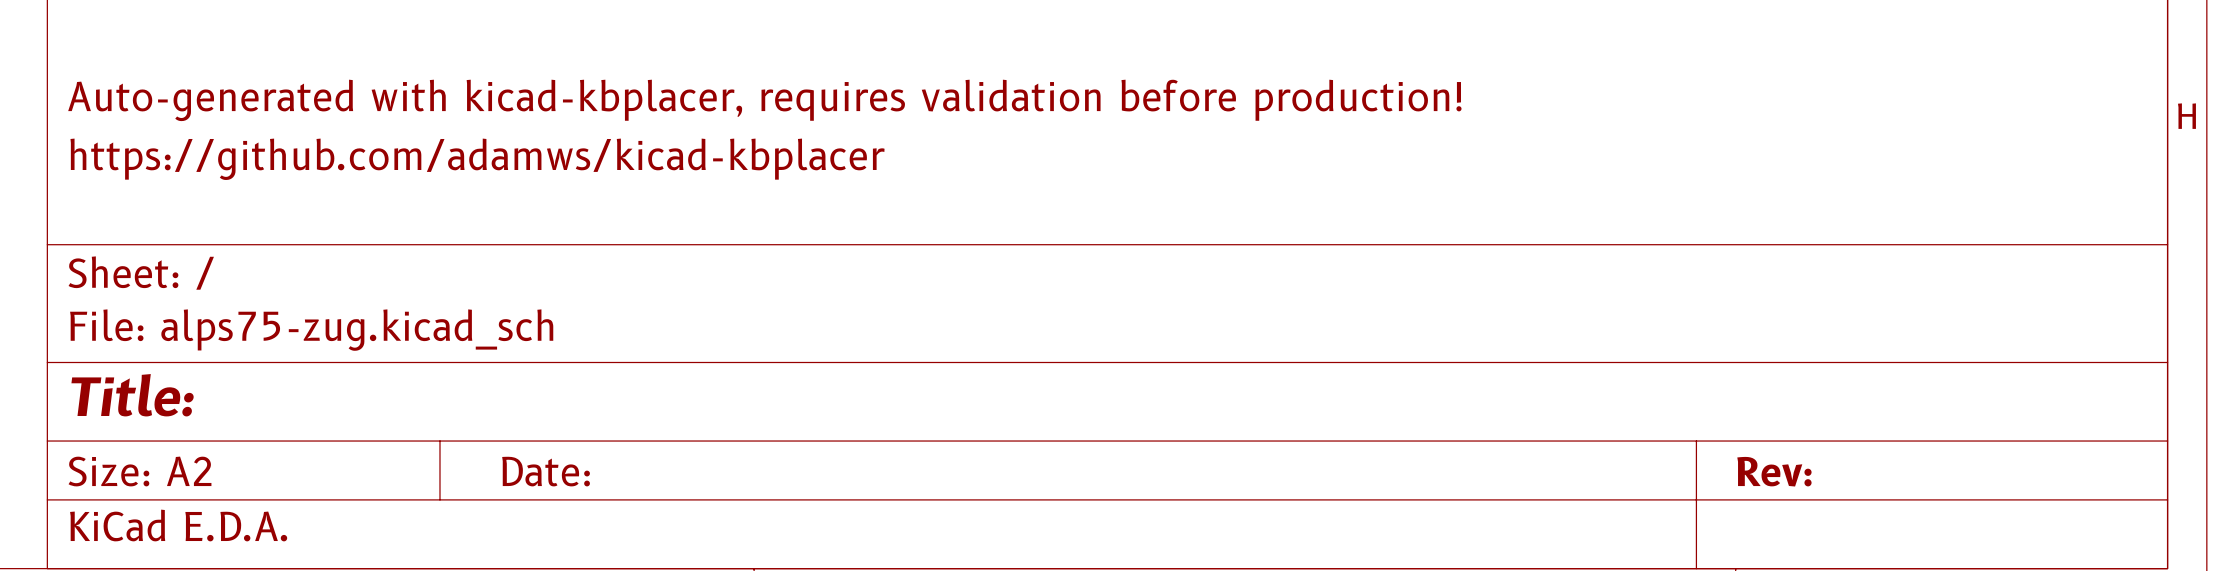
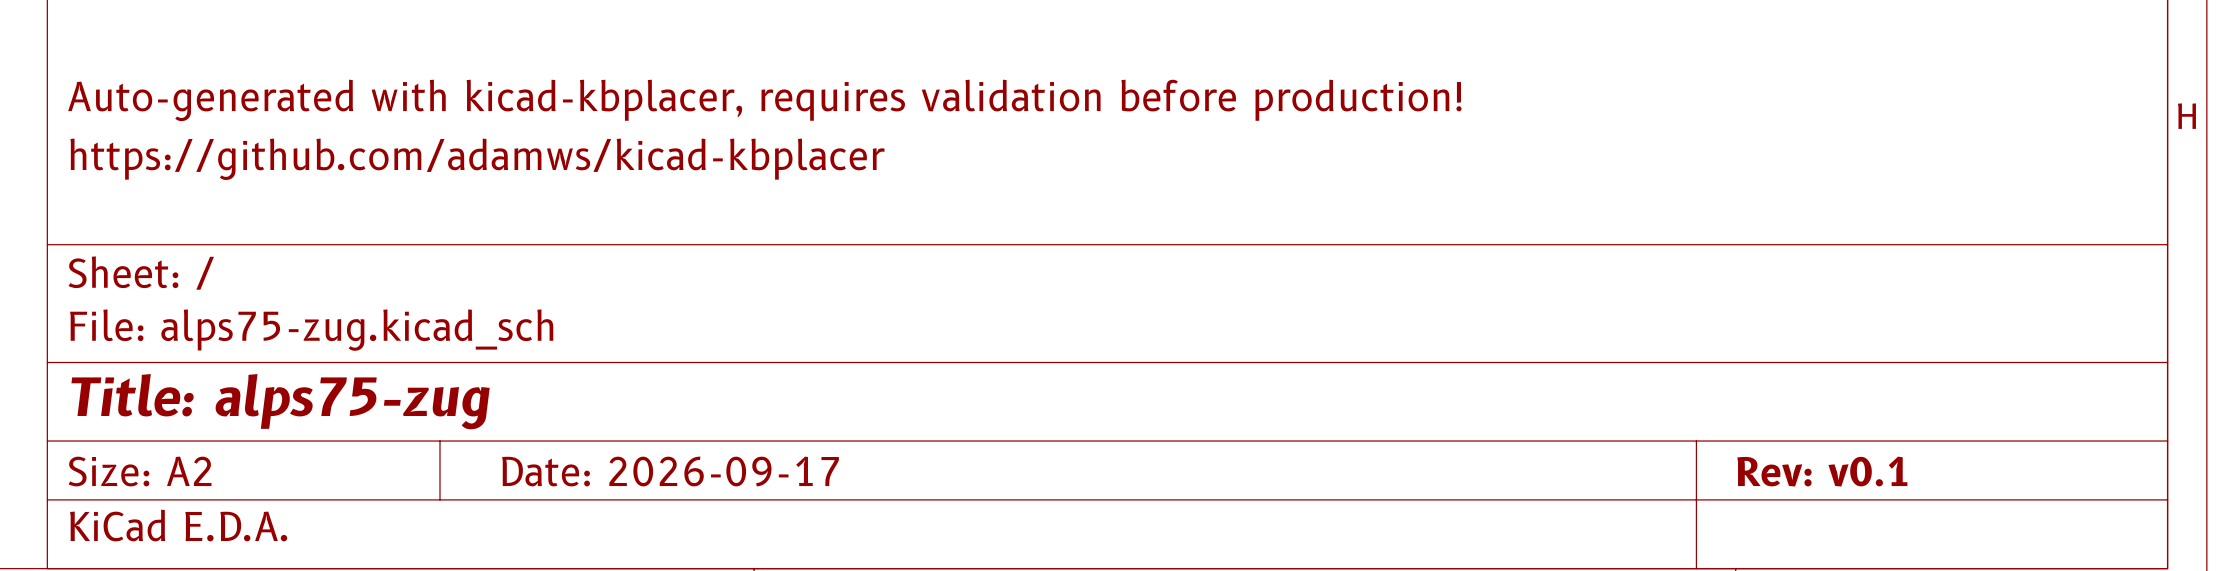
title block: Title: (132, 395) -> Title: alps75-zug (280, 401)
title block: Date: (546, 471) -> Date: 2026-09-17 (670, 471)
title block: Rev: (1774, 471) -> Rev: v0.1 (1822, 471)

